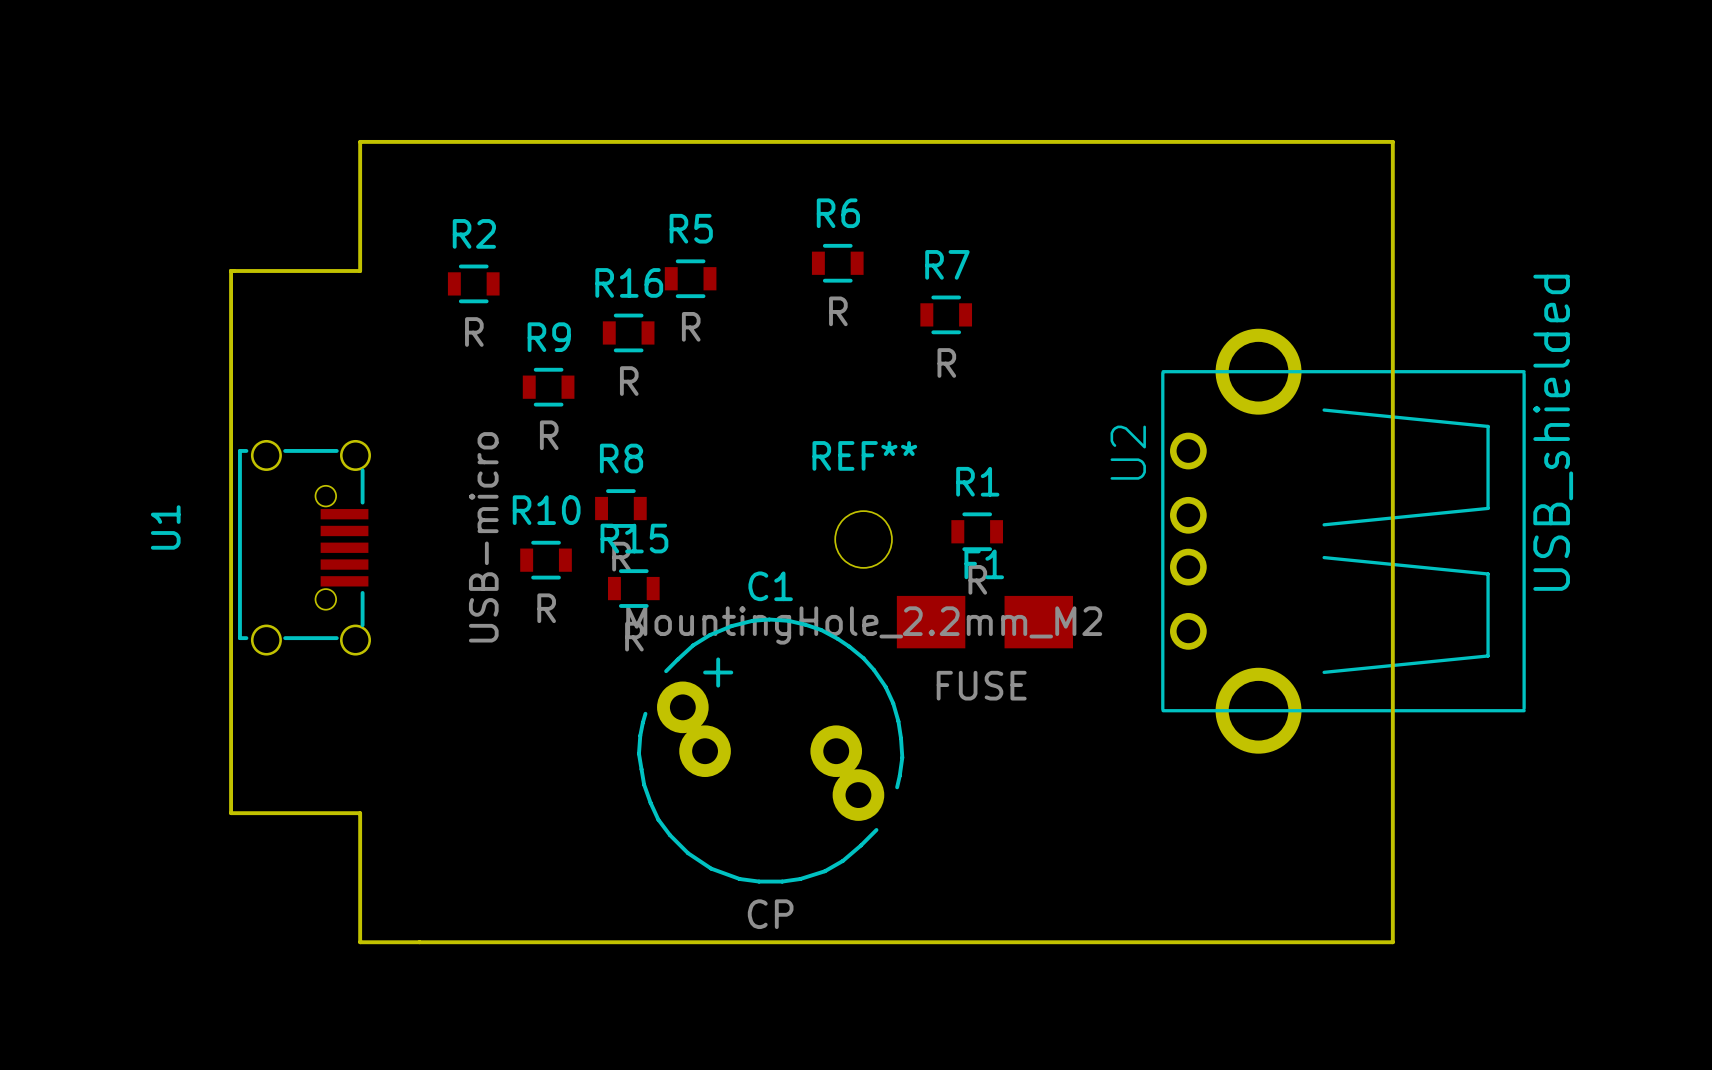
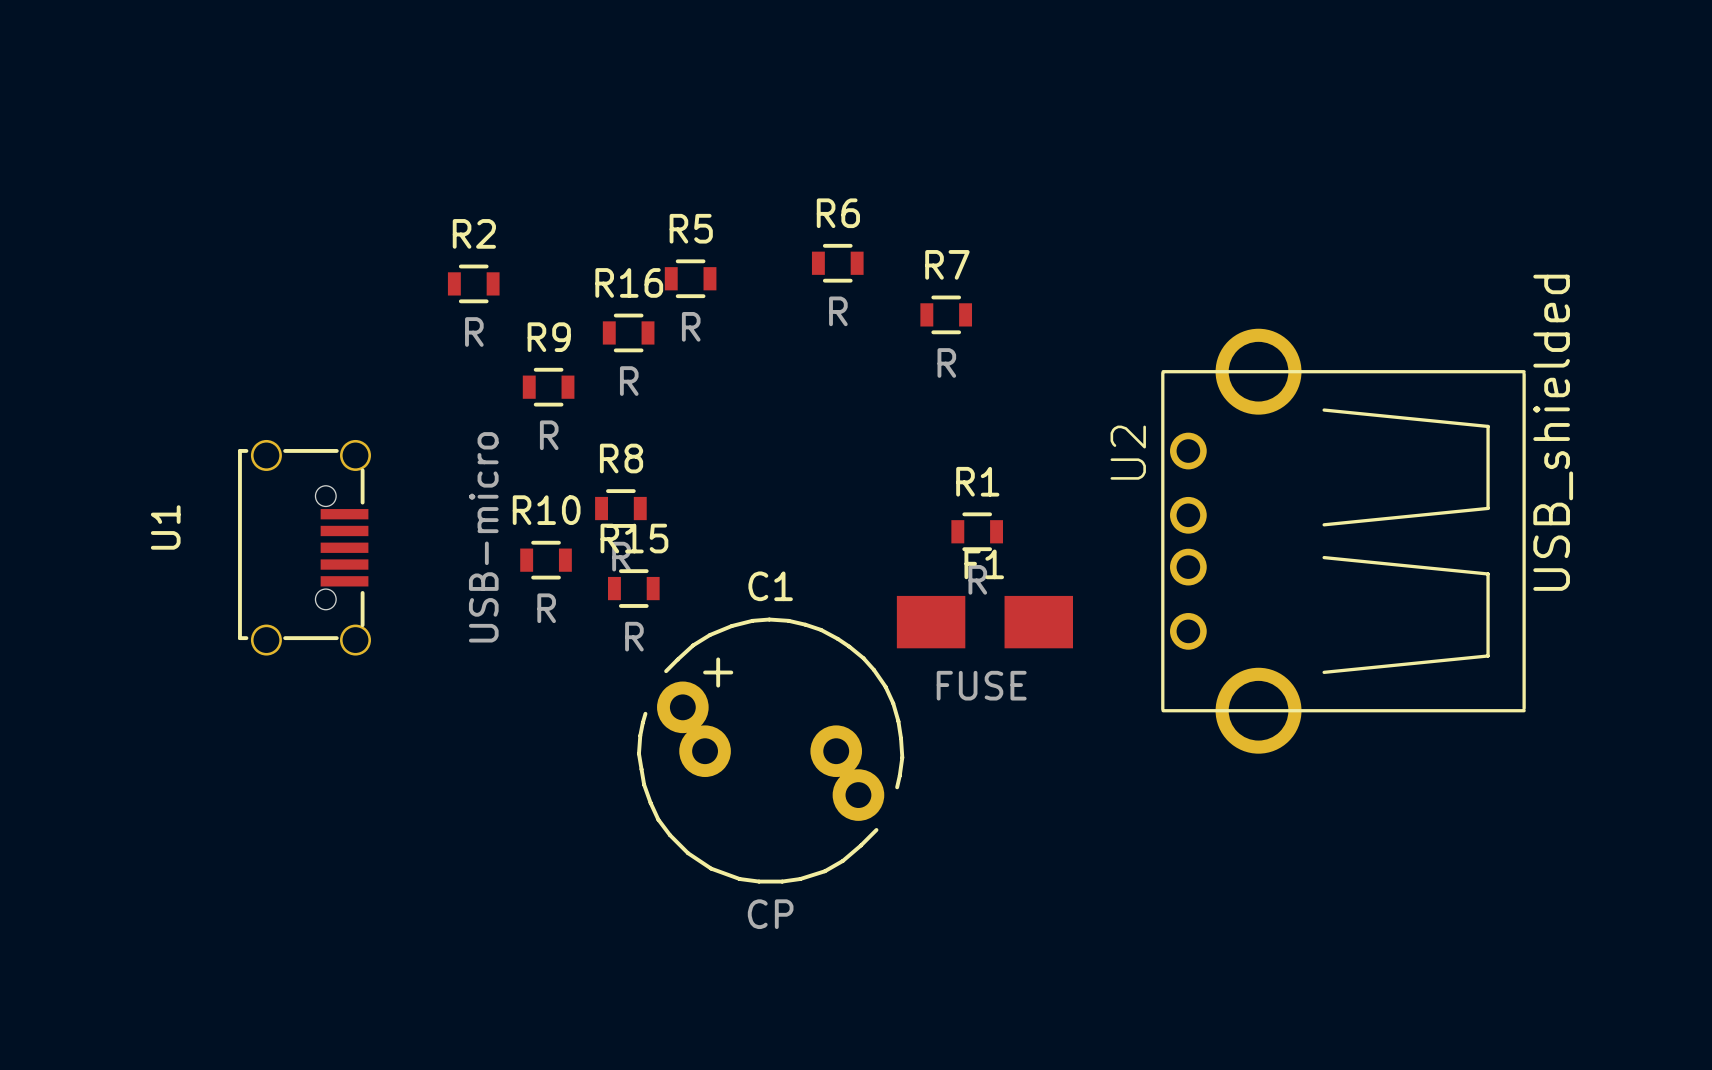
board edge: (360, 141) (360, 271) (231, 271) (231, 813) (360, 813) (360, 942) (1392, 942) (1392, 141) (360, 141) -> none
REF**: MountingHole_2.2mm_M2 (863, 539) -> none

